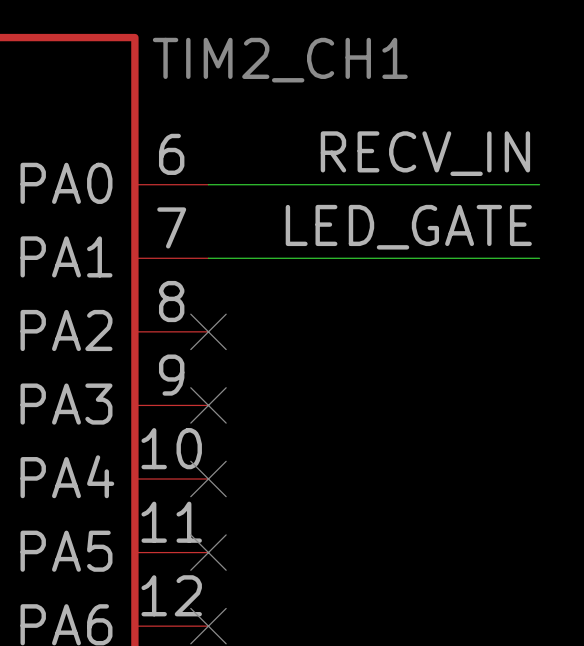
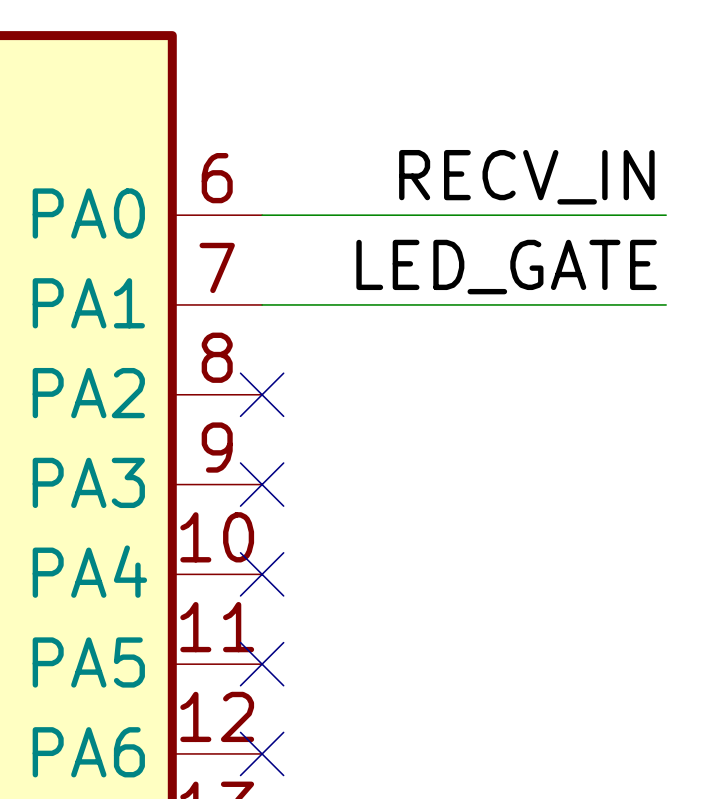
text: TIM2_CH1 (280, 60) -> none

